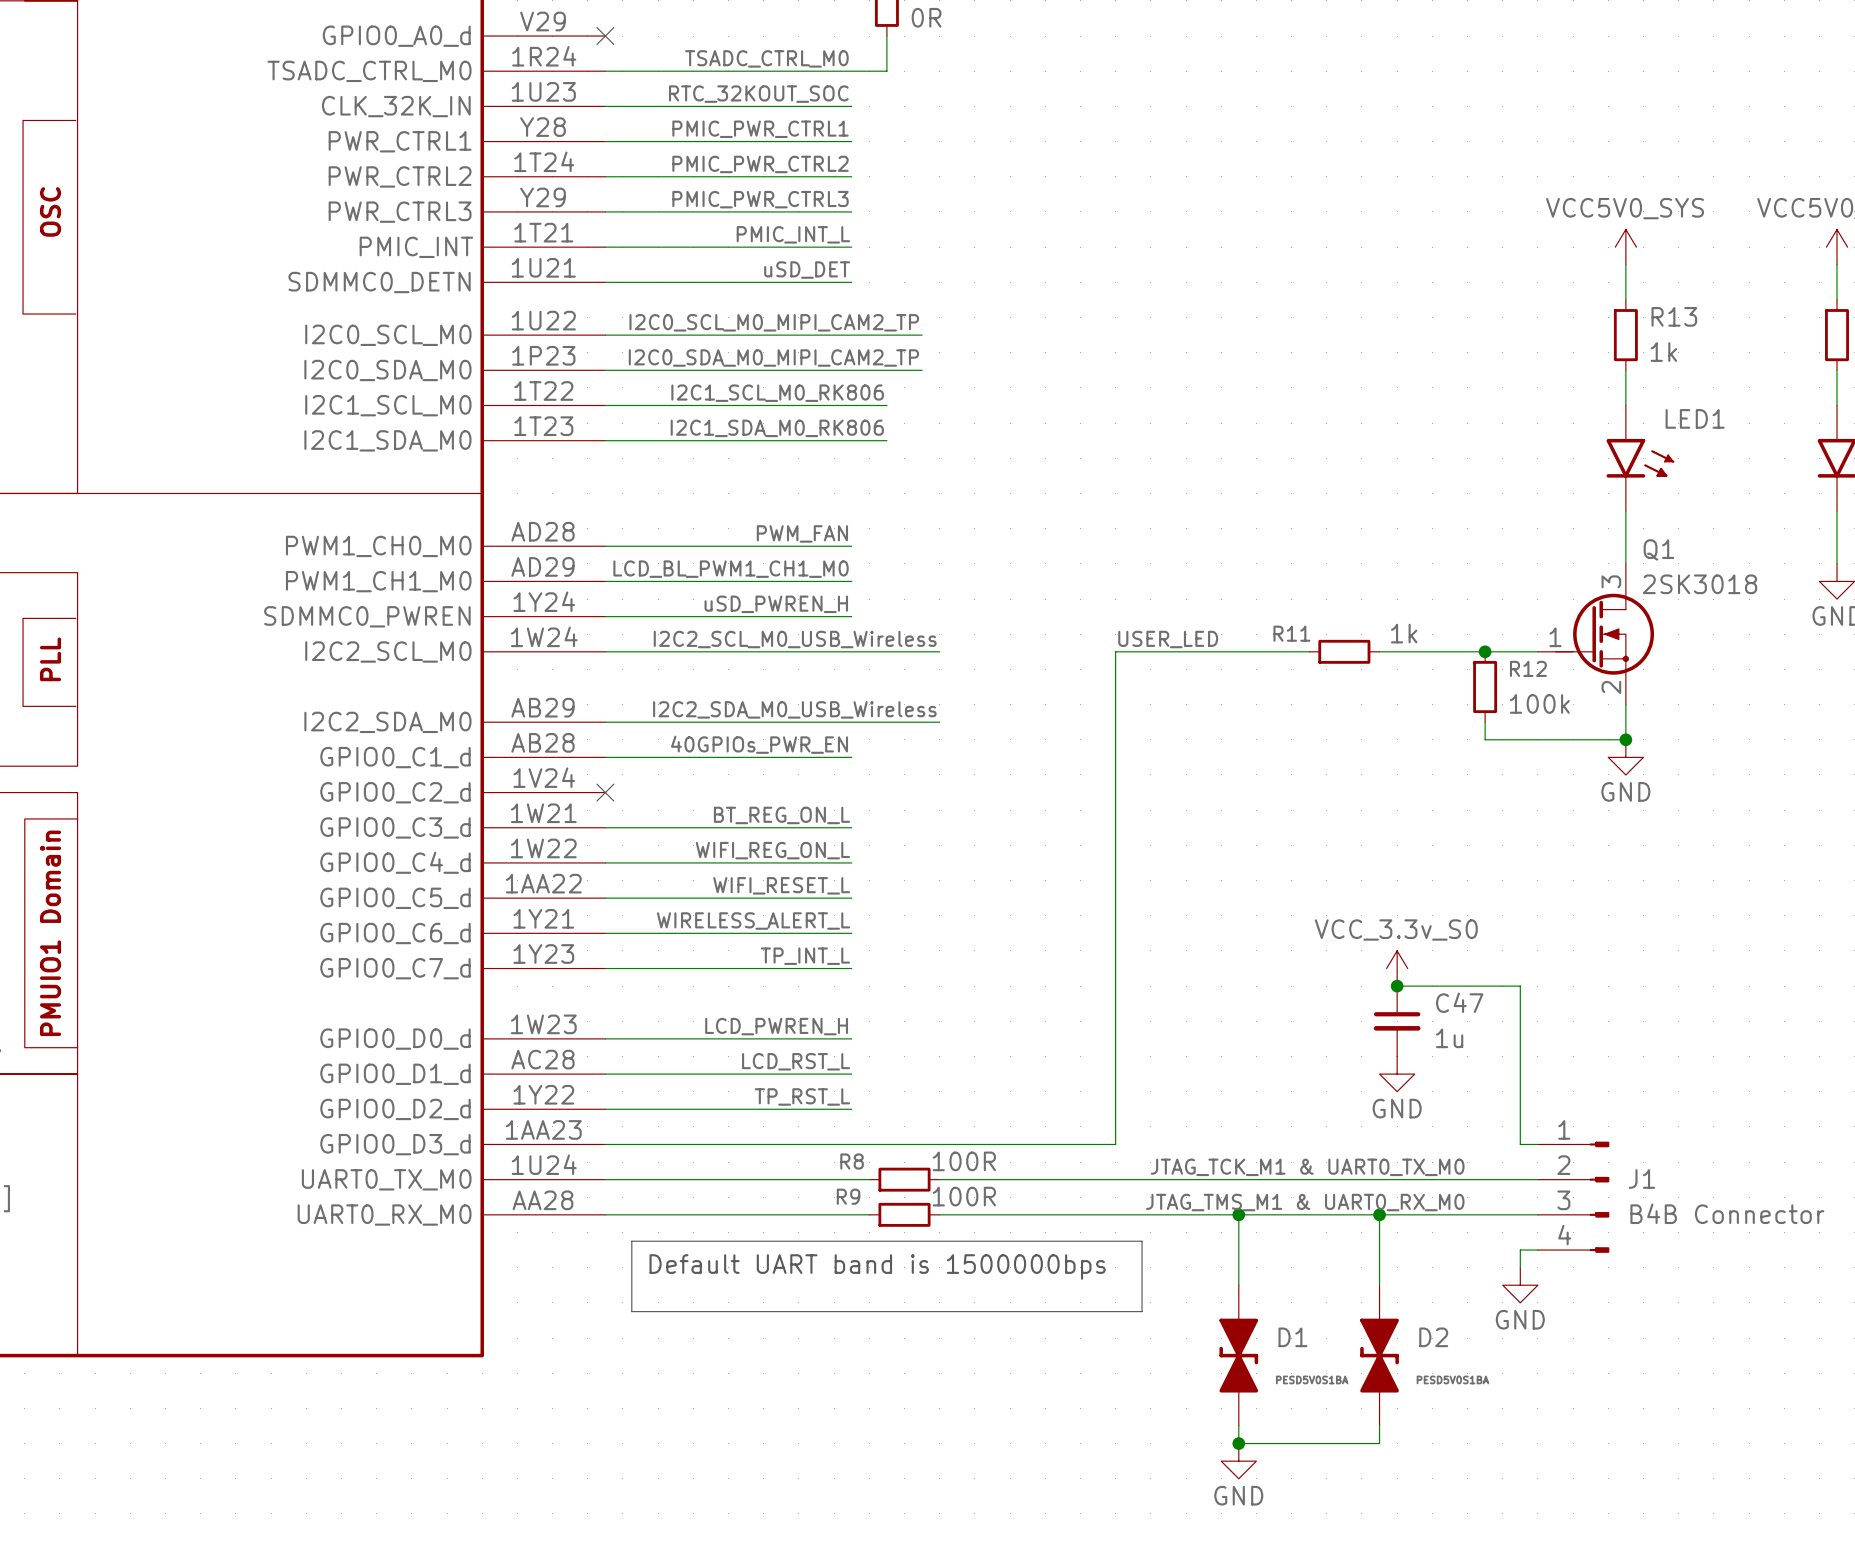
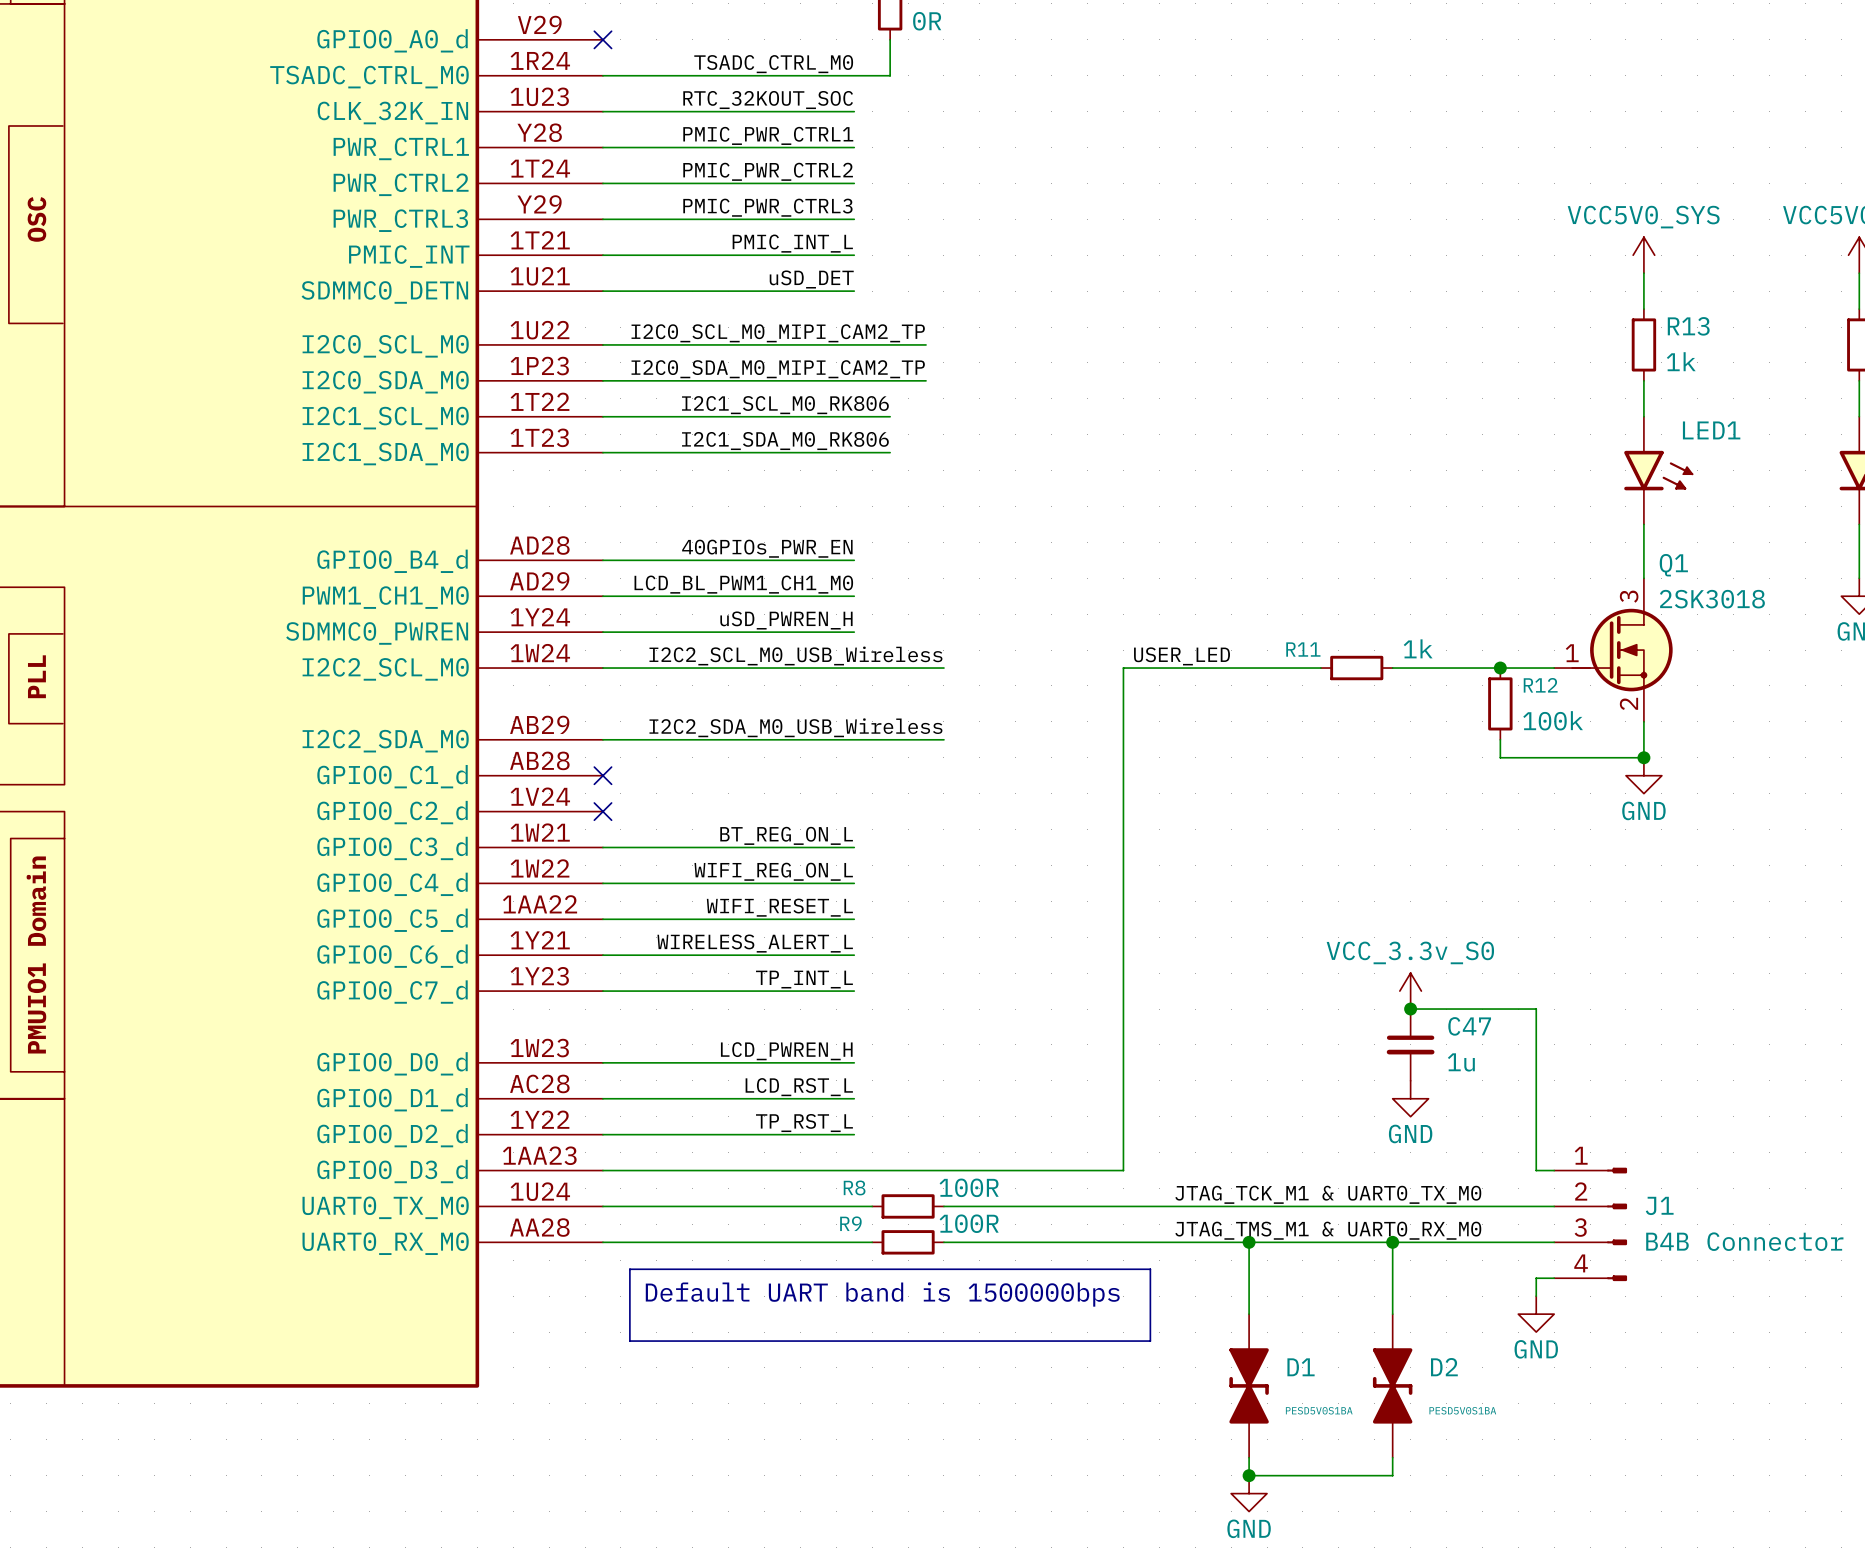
label: PWM_FAN (802, 533) -> 40GPIOs_PWR_EN (767, 548)
part pin name: PWM1_CH0_M0 (378, 546) -> GPIO0_B4_d (392, 561)
label: 40GPIOs_PWR_EN (759, 744) -> none
wire: (605, 757) (851, 757) -> none
no-connect mark: none -> (602, 775)

